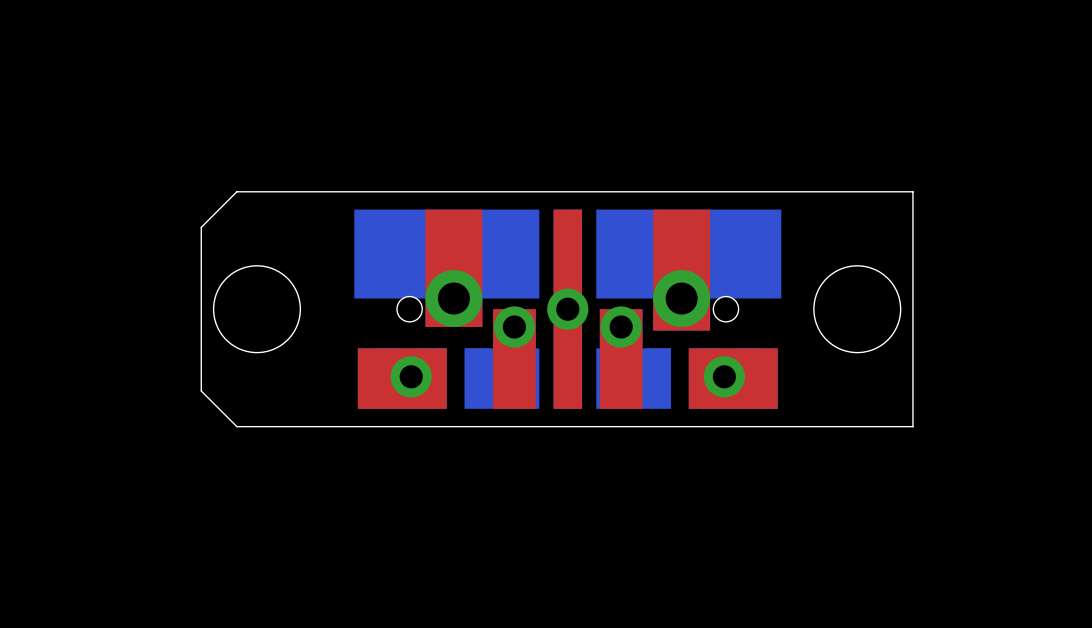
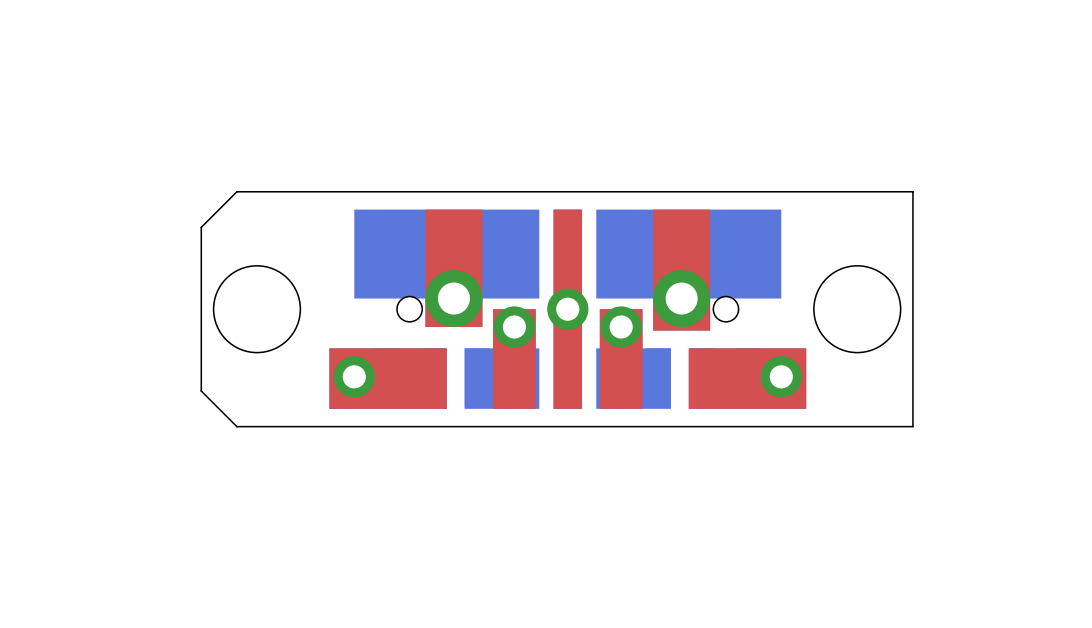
drawing: none -> [329, 348, 447, 409]
drawing: [357, 348, 447, 409] -> none
drawing: [688, 348, 778, 409] -> none
drawing: none -> [688, 348, 807, 409]
part position: (411, 376) -> (354, 376)
part position: (724, 376) -> (781, 376)

